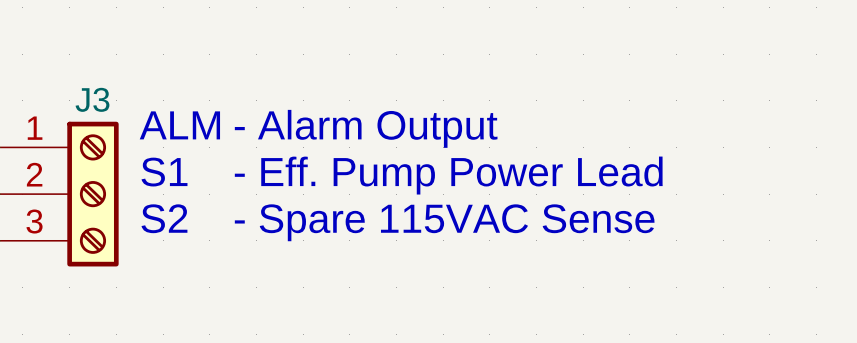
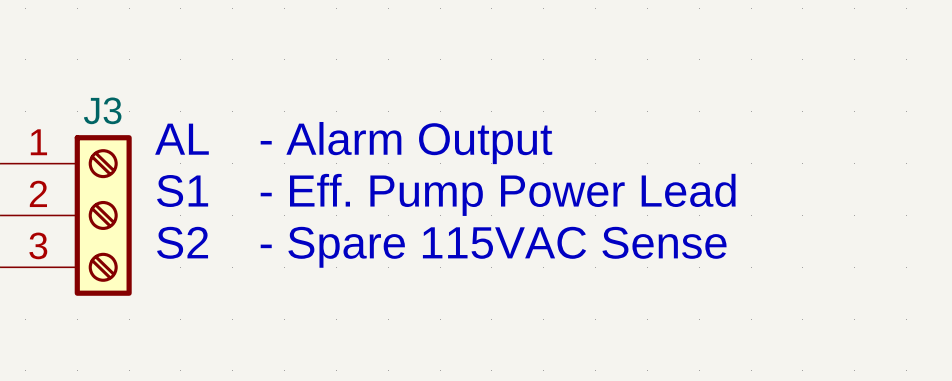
text: ALM (179, 125) -> AL (181, 139)

